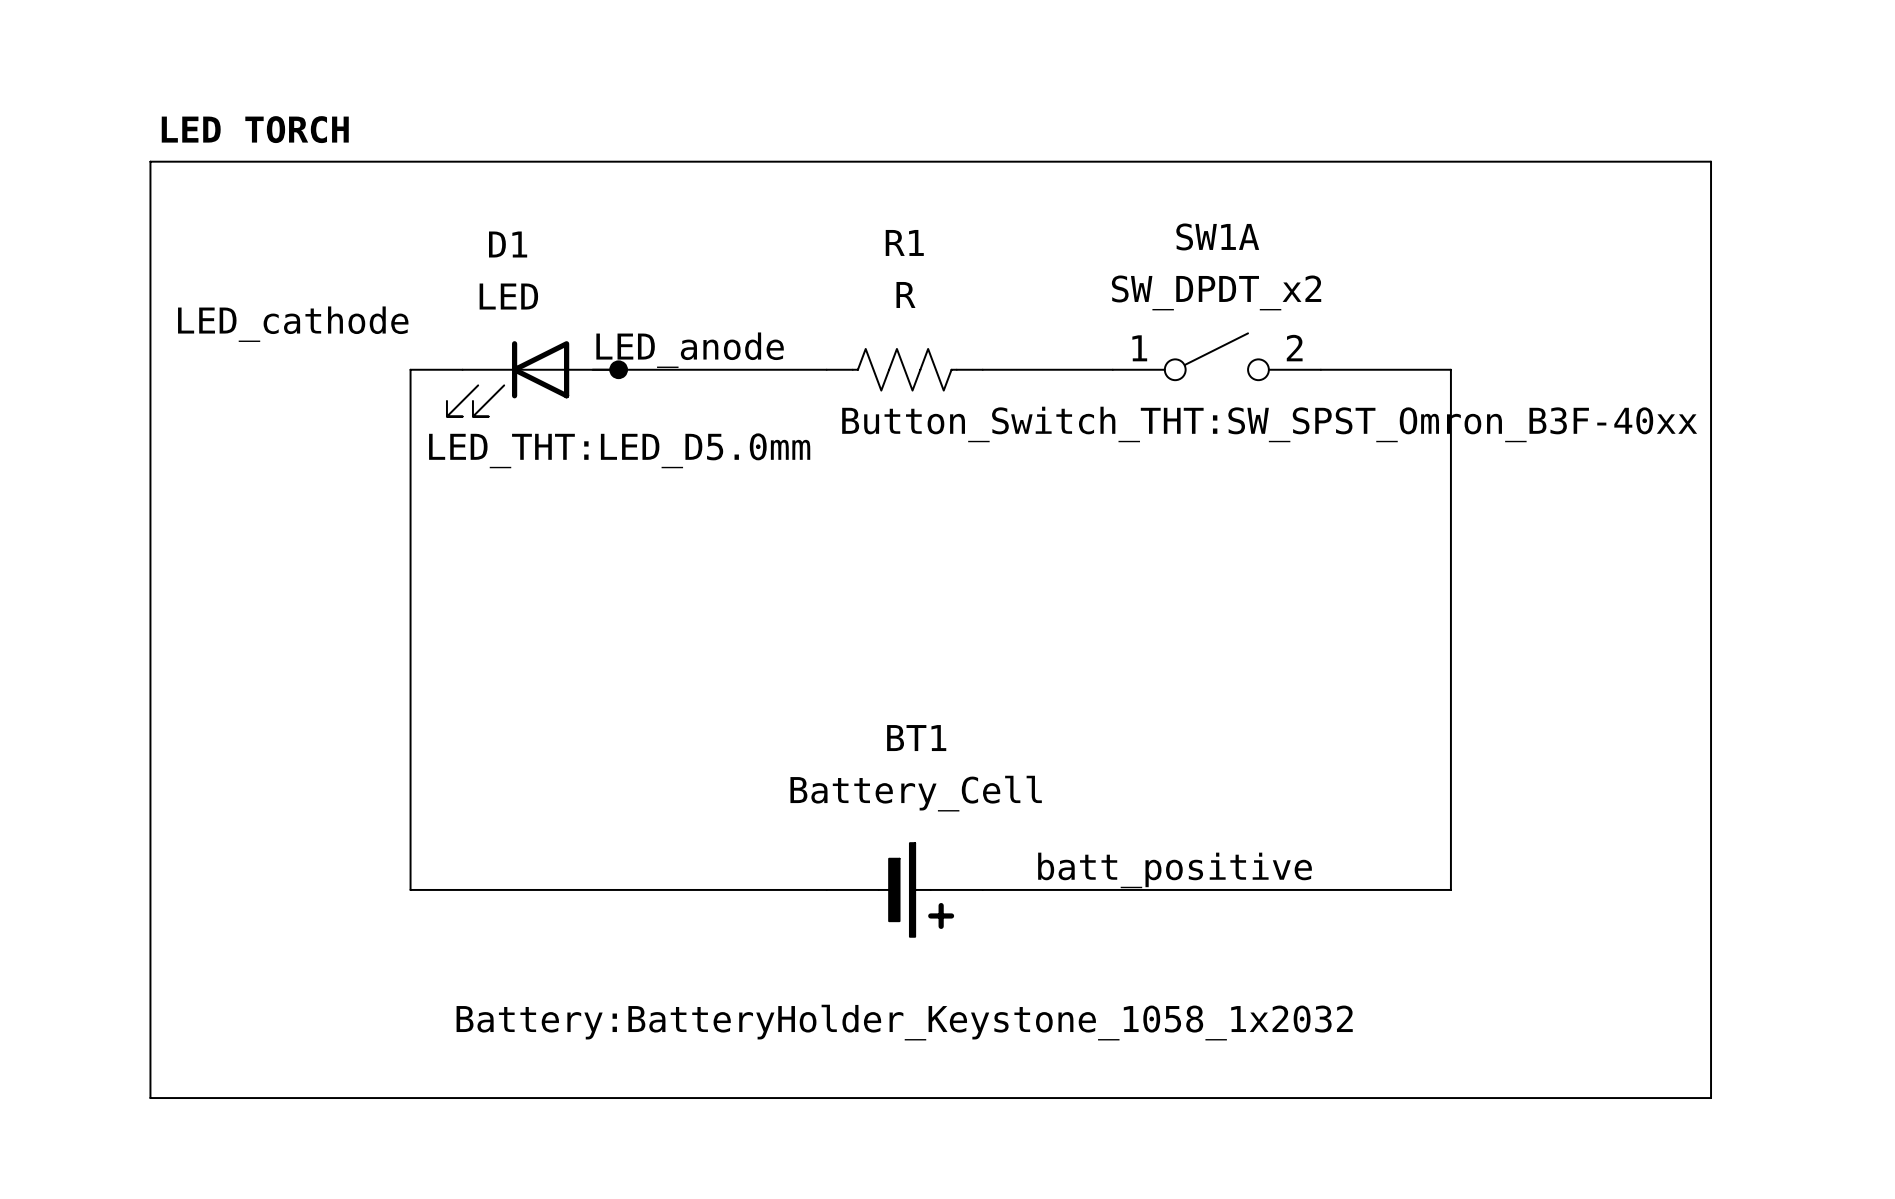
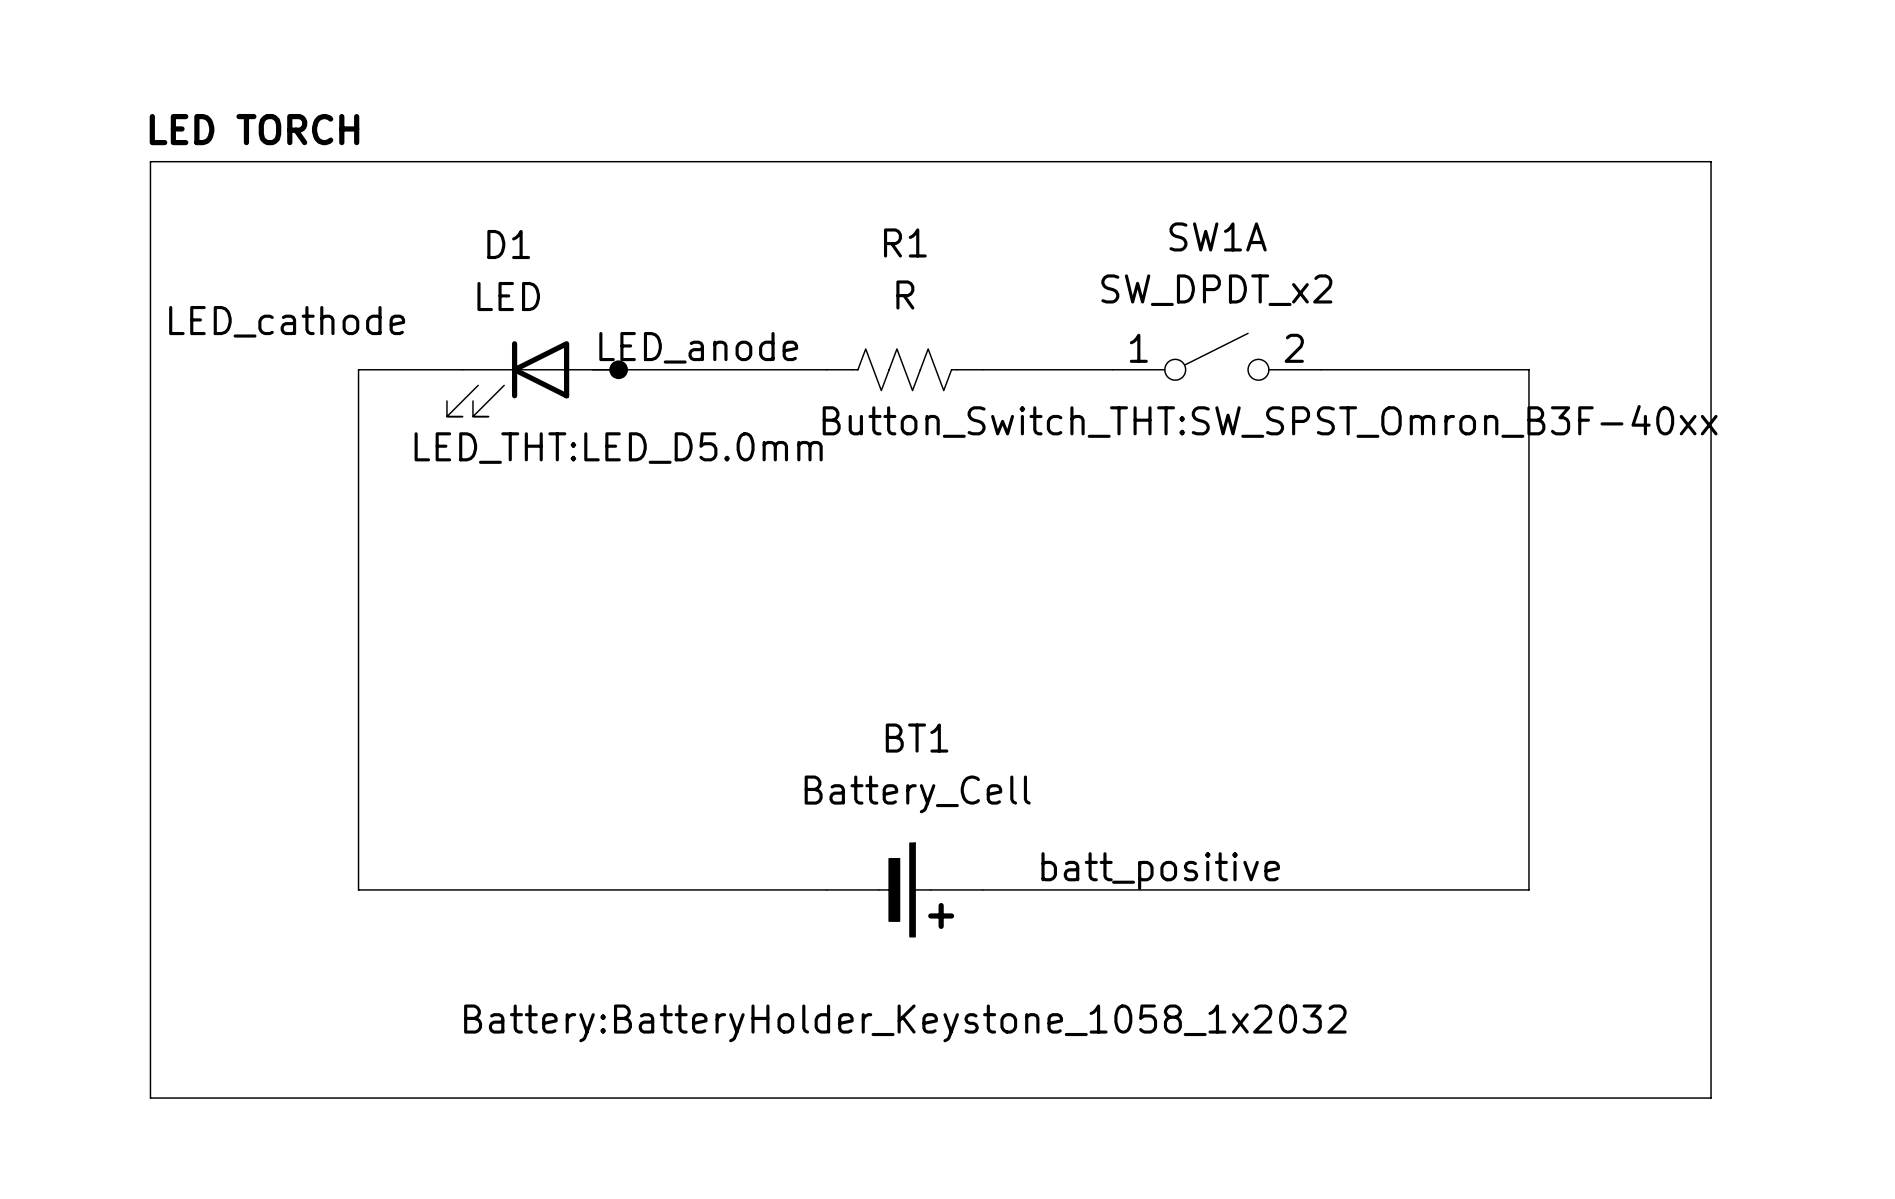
wire: (410, 369) (410, 889) -> (410, 369) (358, 369) (358, 889) (410, 889)
wire: (1450, 369) (1450, 889) -> (1450, 369) (1528, 369) (1528, 889) (1450, 889)

